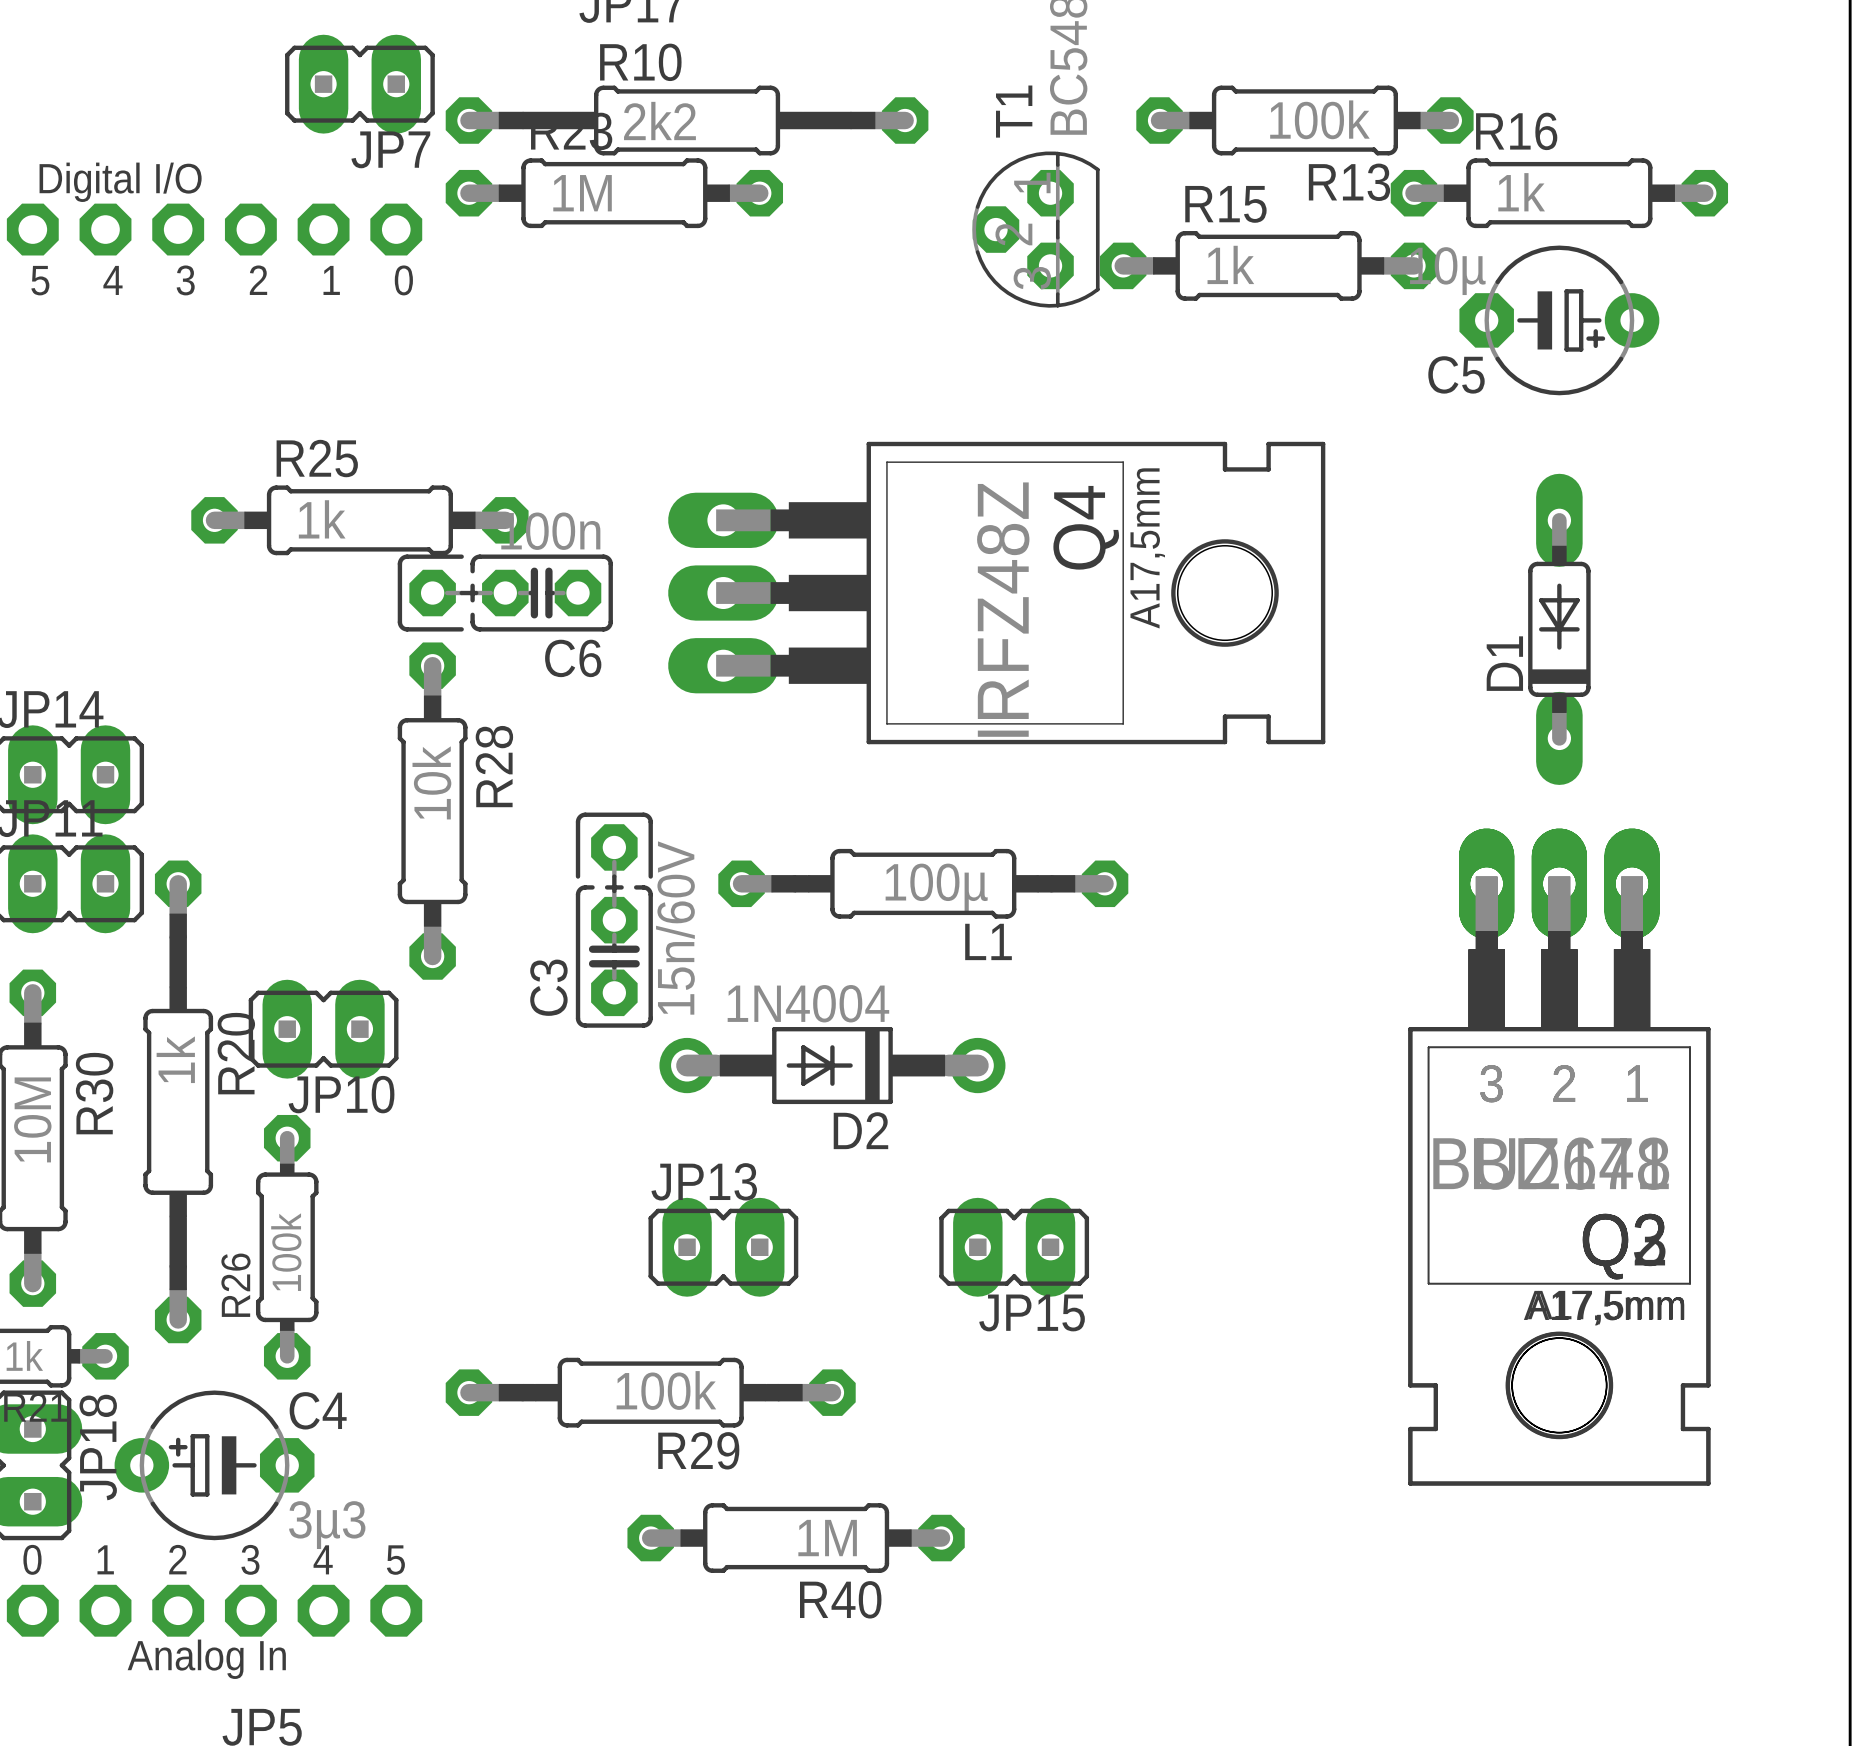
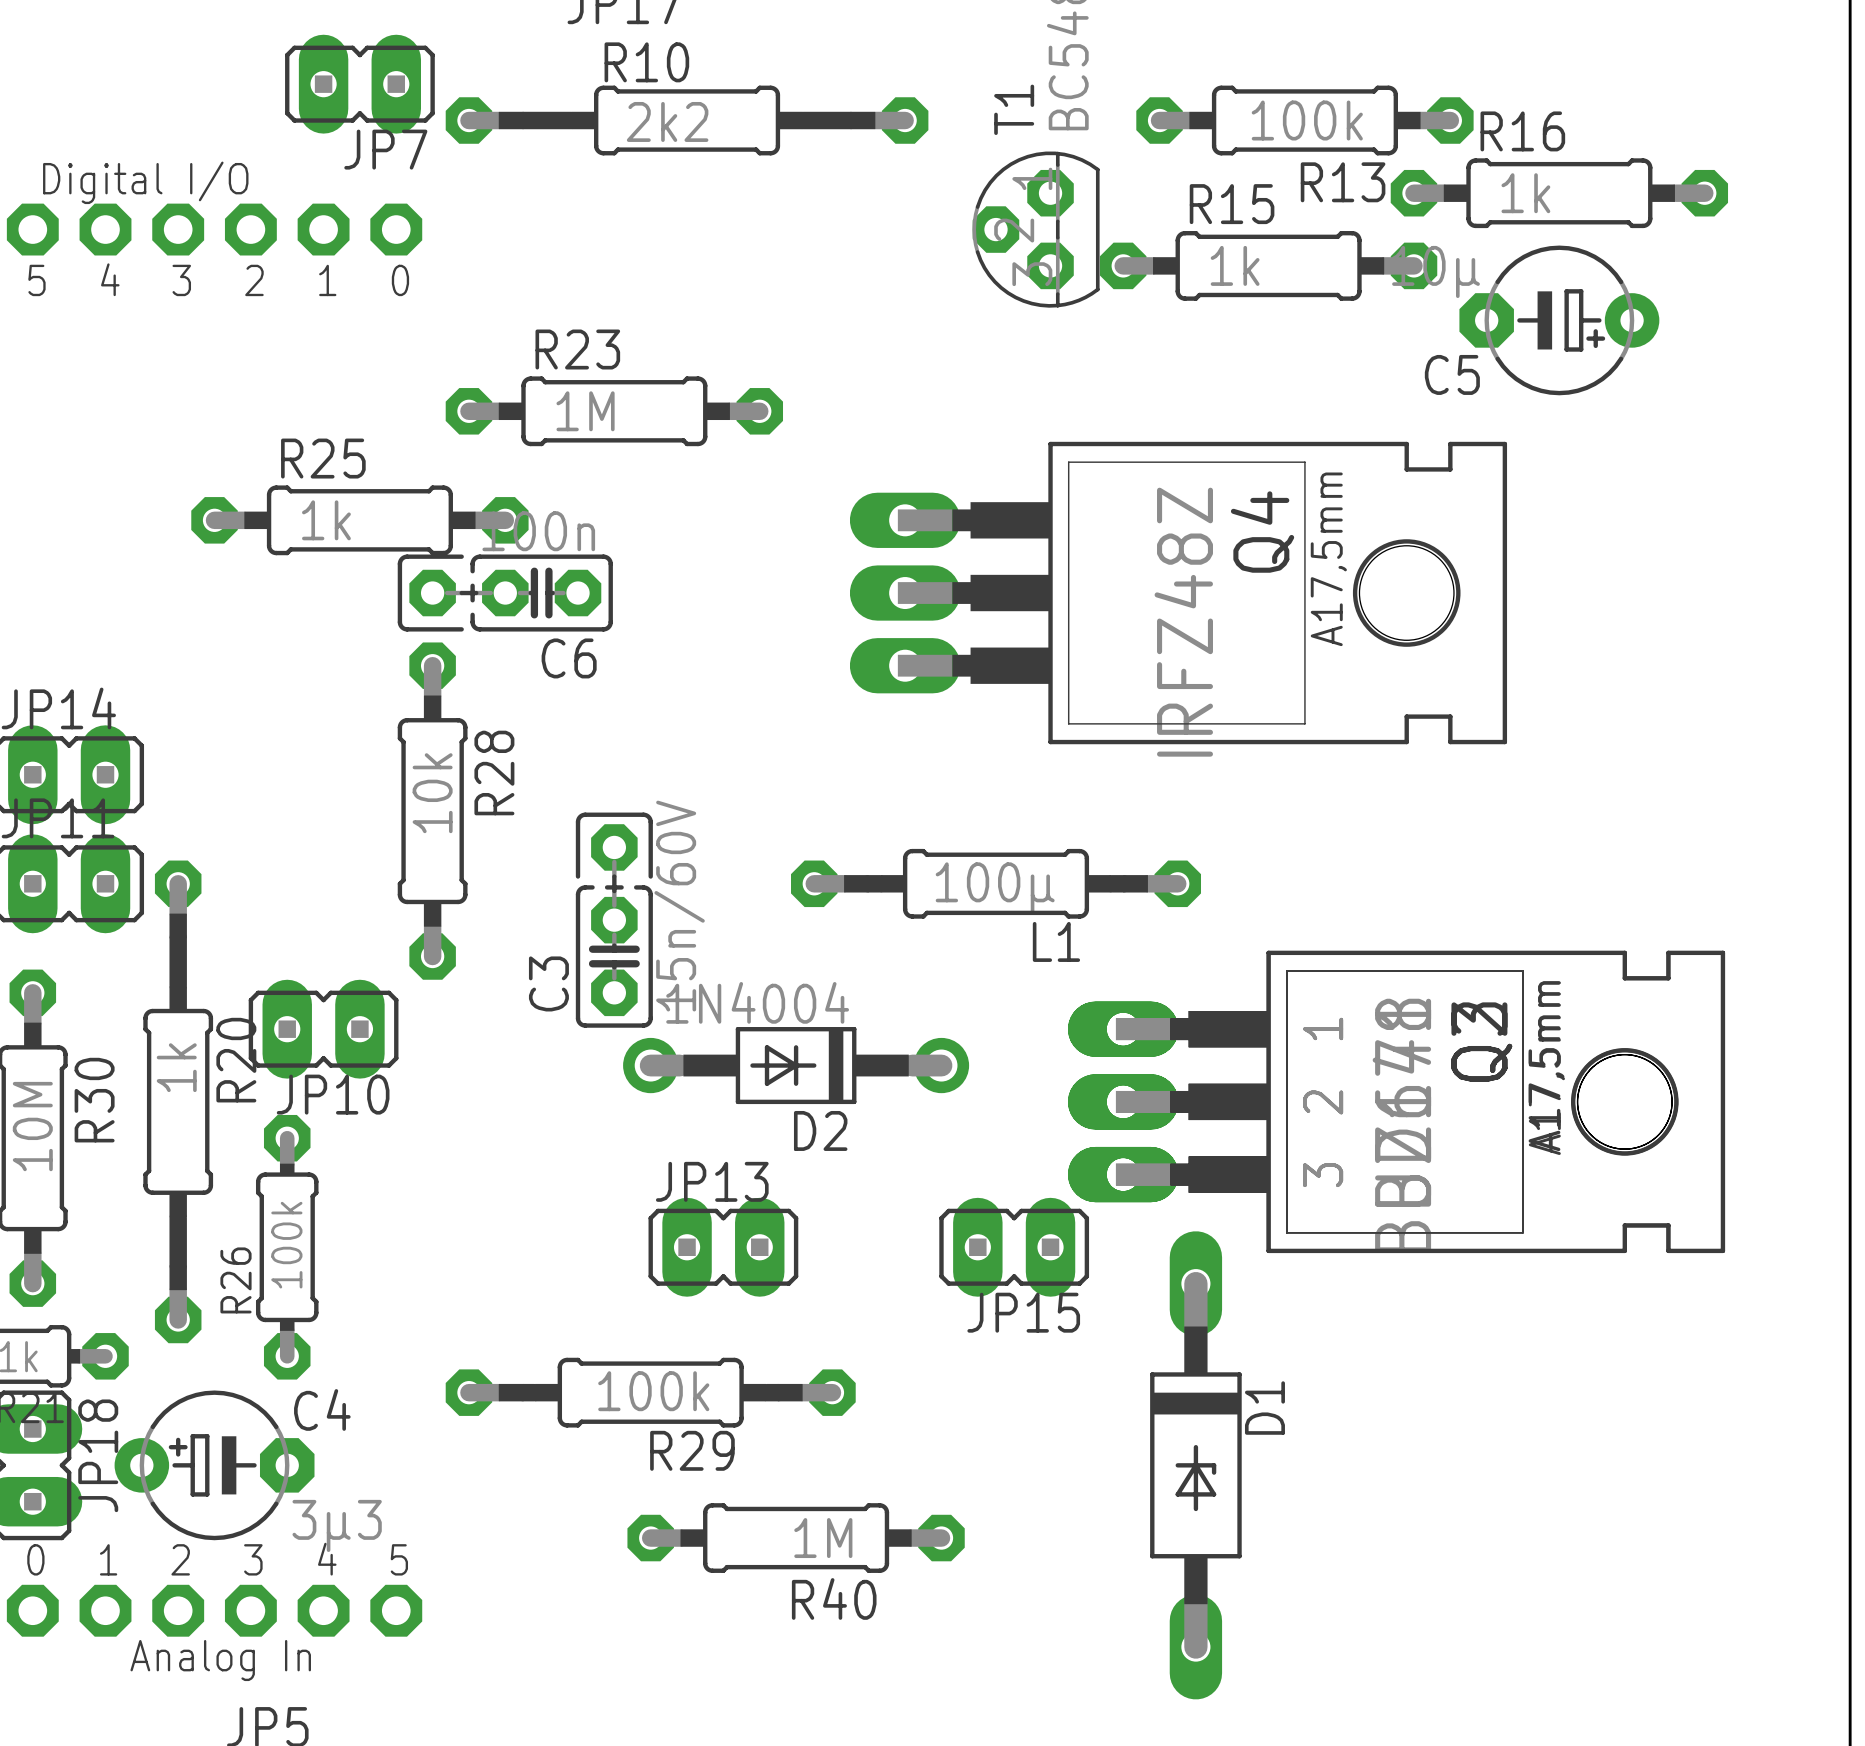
R23 position: (614, 193) -> (614, 411)
D1 footprint: [1528, 473, 1591, 785] -> [1150, 1231, 1242, 1700]
Q4 position: (996, 593) -> (1178, 593)
D1 name position: D1 (1504, 663) -> D1 (1264, 1408)
L1 position: (923, 883) -> (996, 883)
D2 position: (832, 1065) -> (796, 1065)
part rotation: 0° (1559, 1156) -> 90° counterclockwise (1396, 1101)
part rotation: 0° (1559, 1157) -> 90° counterclockwise (1396, 1101)

